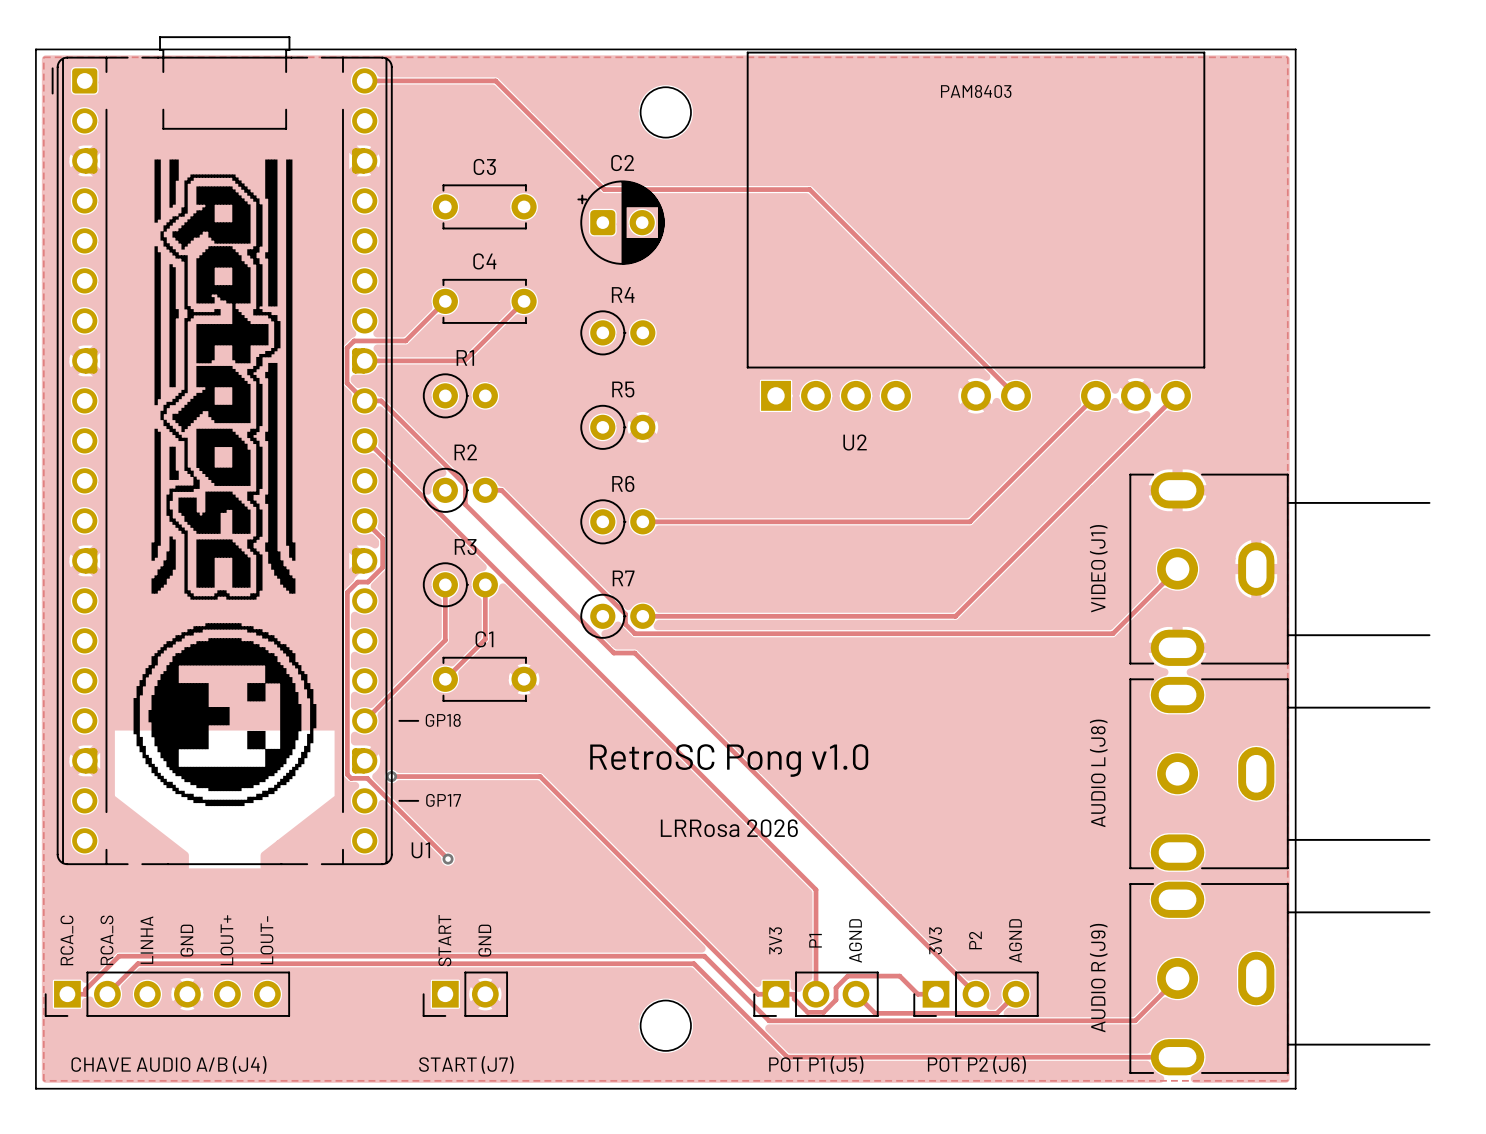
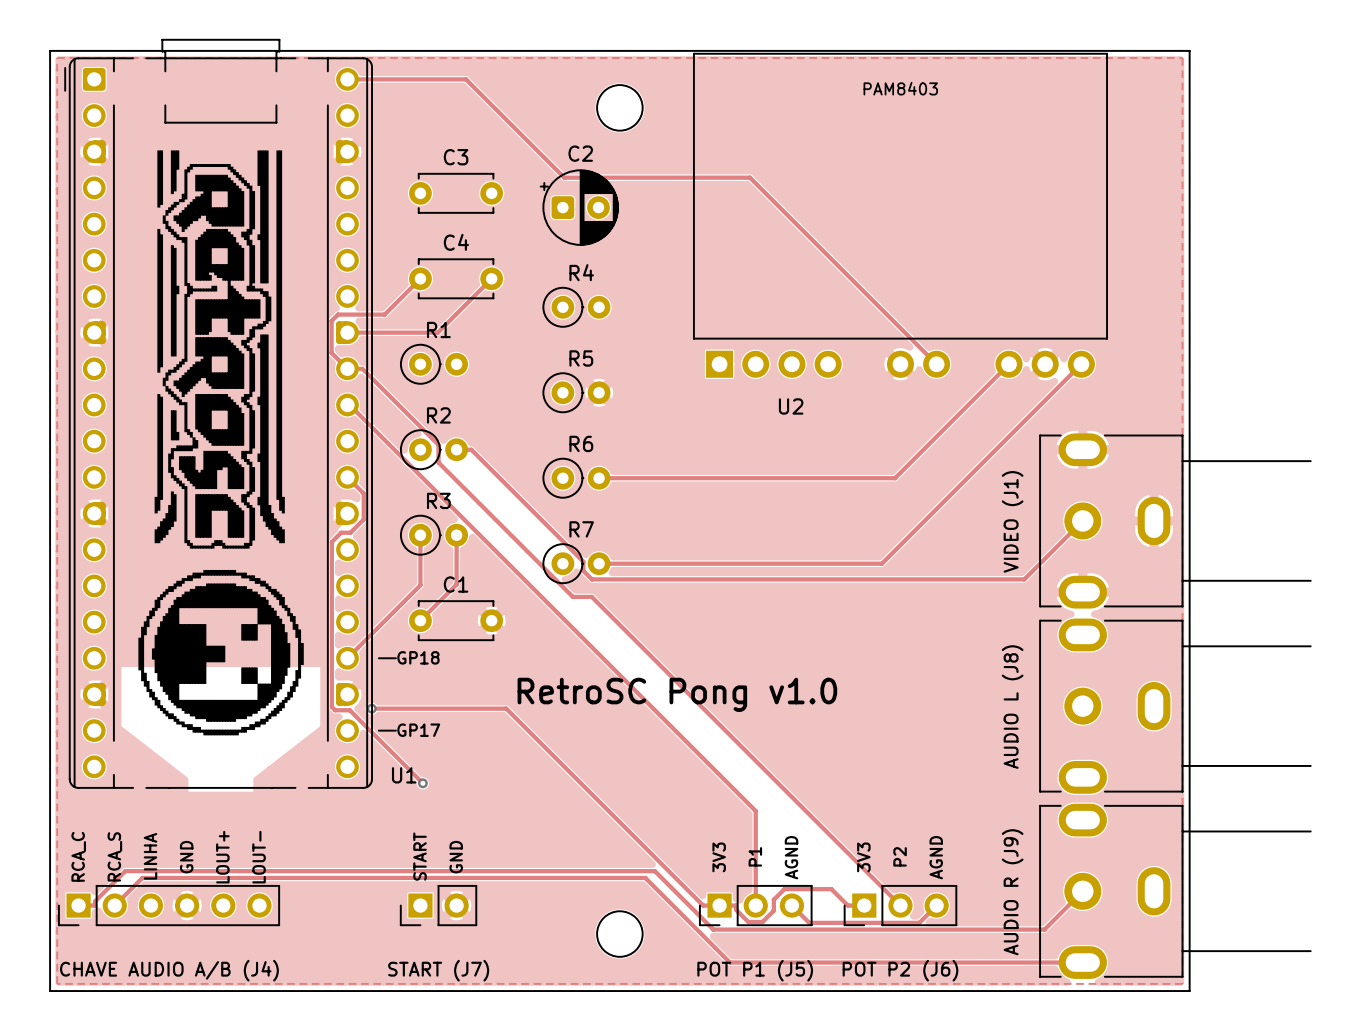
text: LRRosa 2026 (729, 828) -> none

